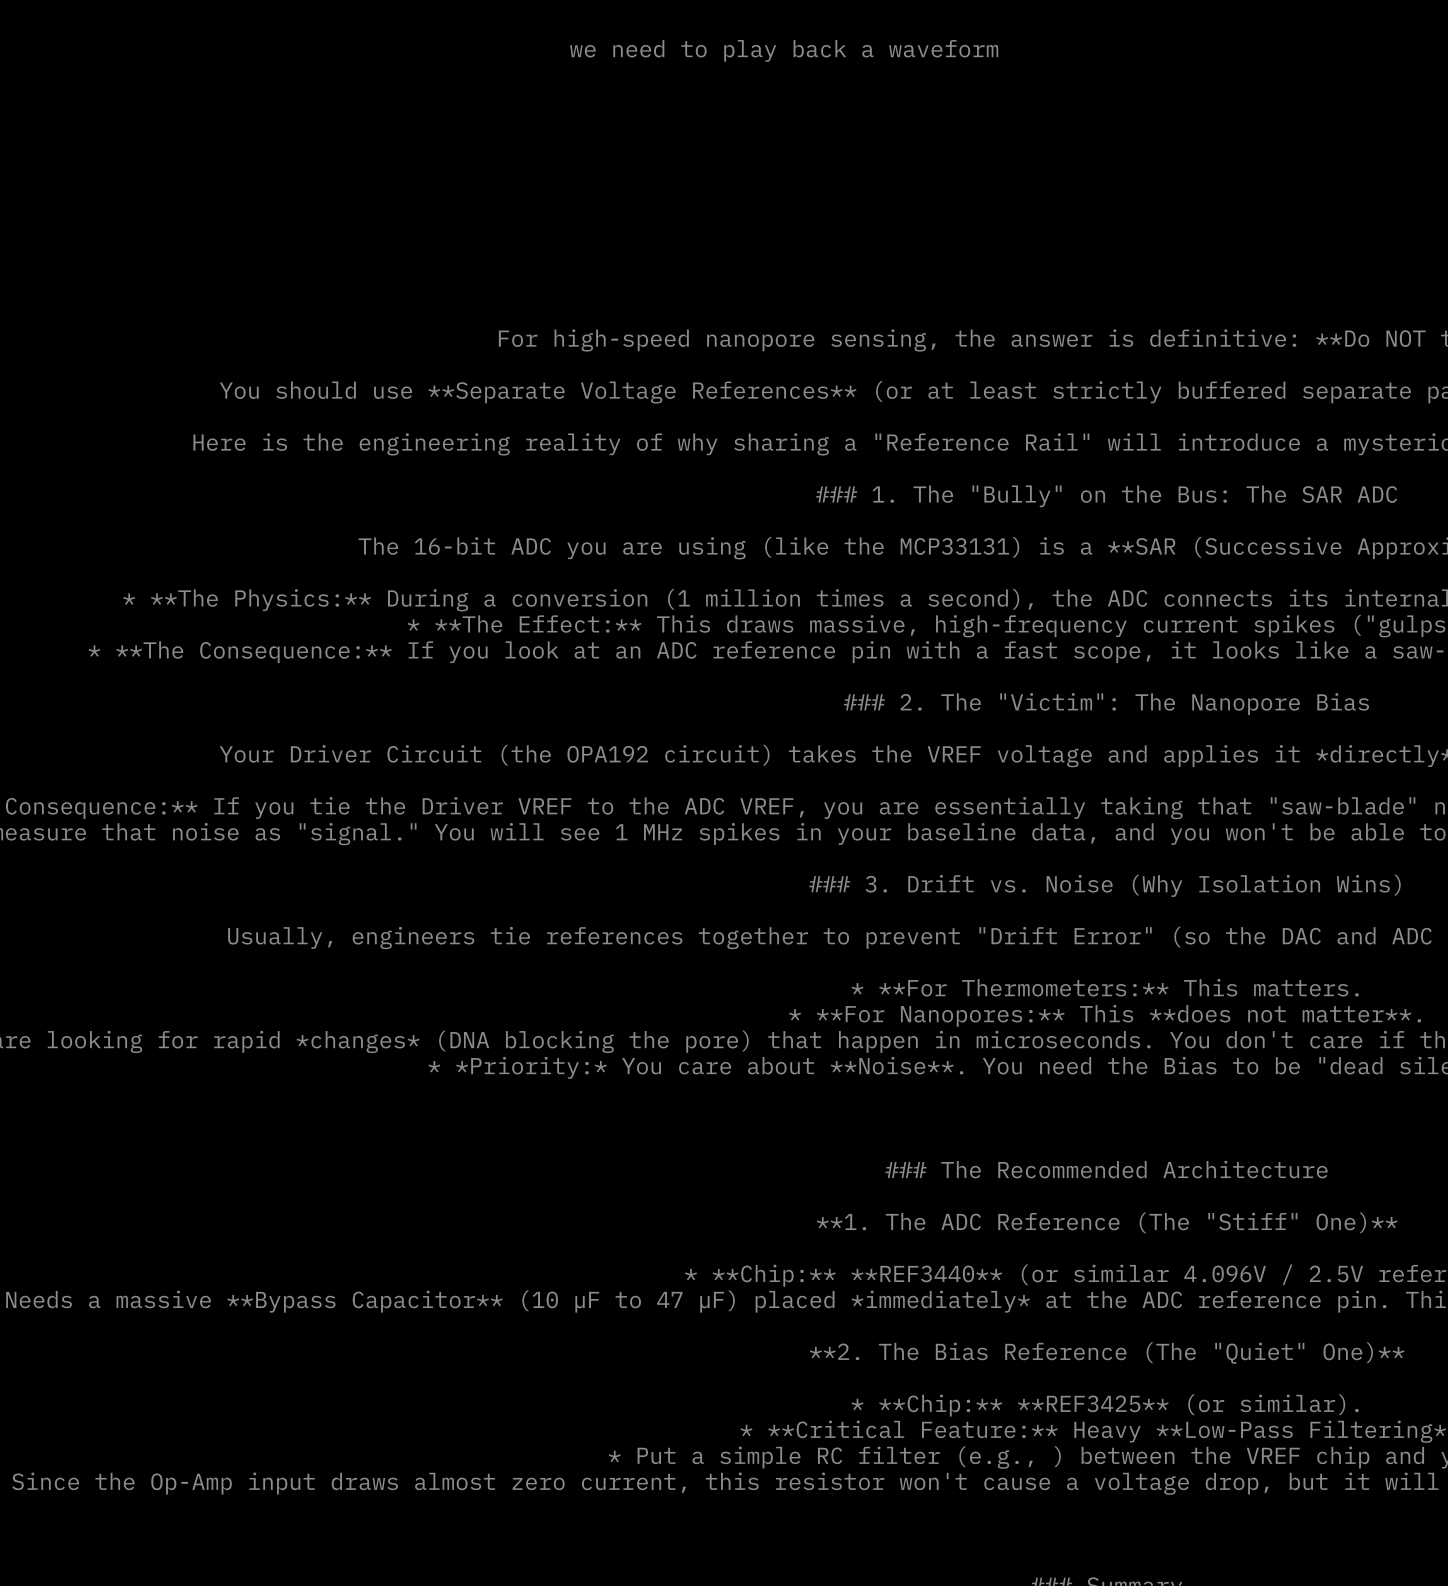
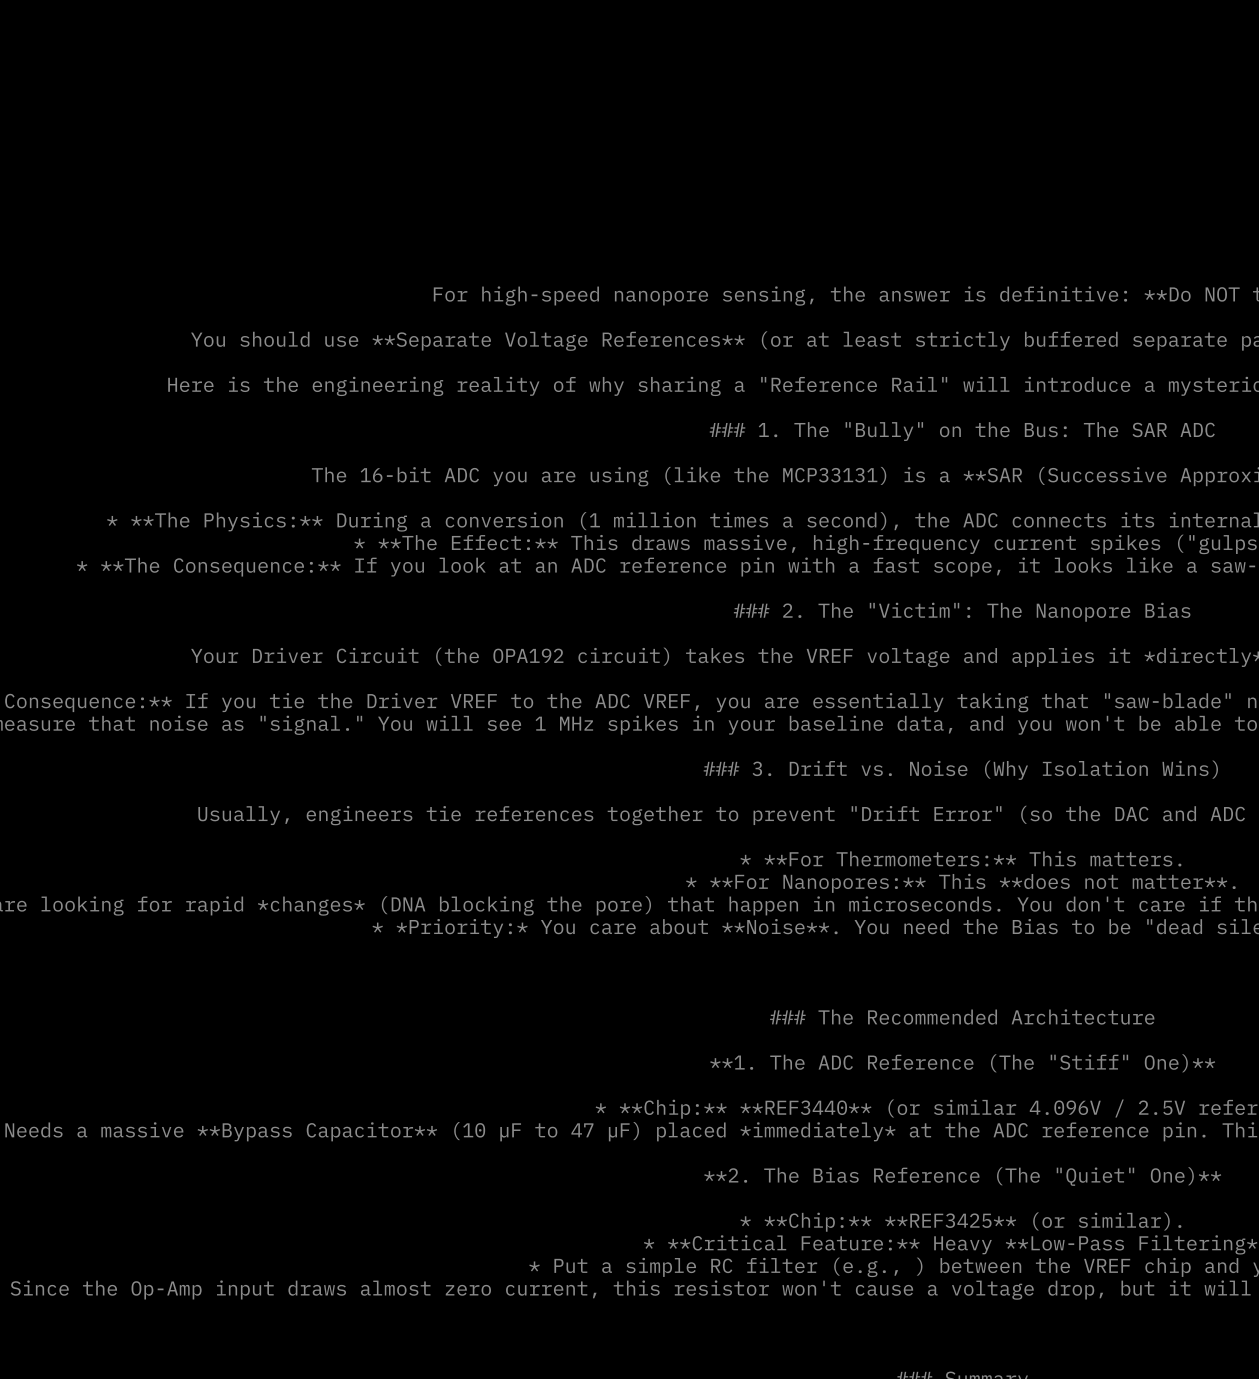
text: we need to play back a waveform (784, 50) -> none

